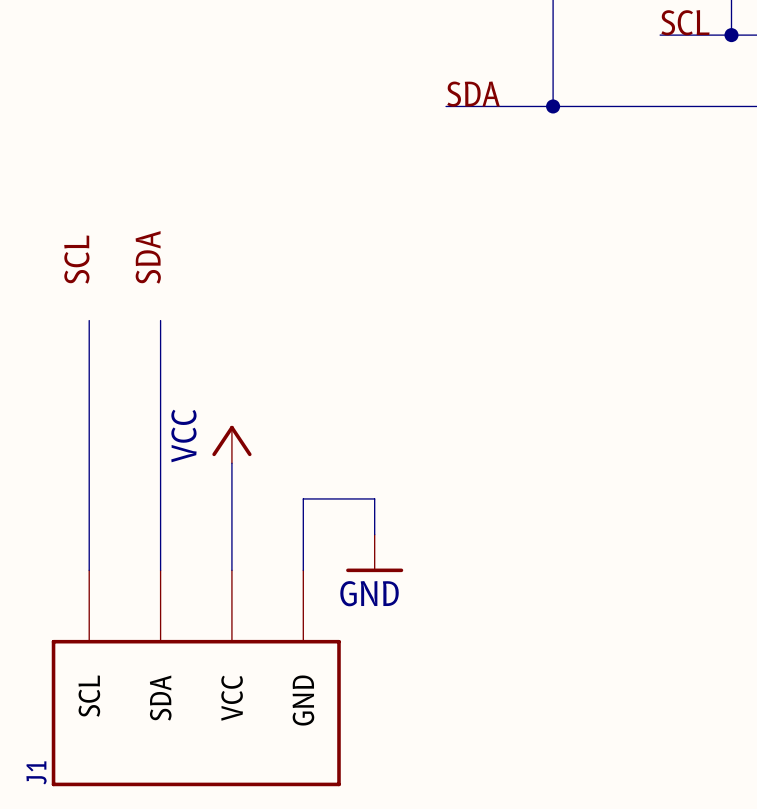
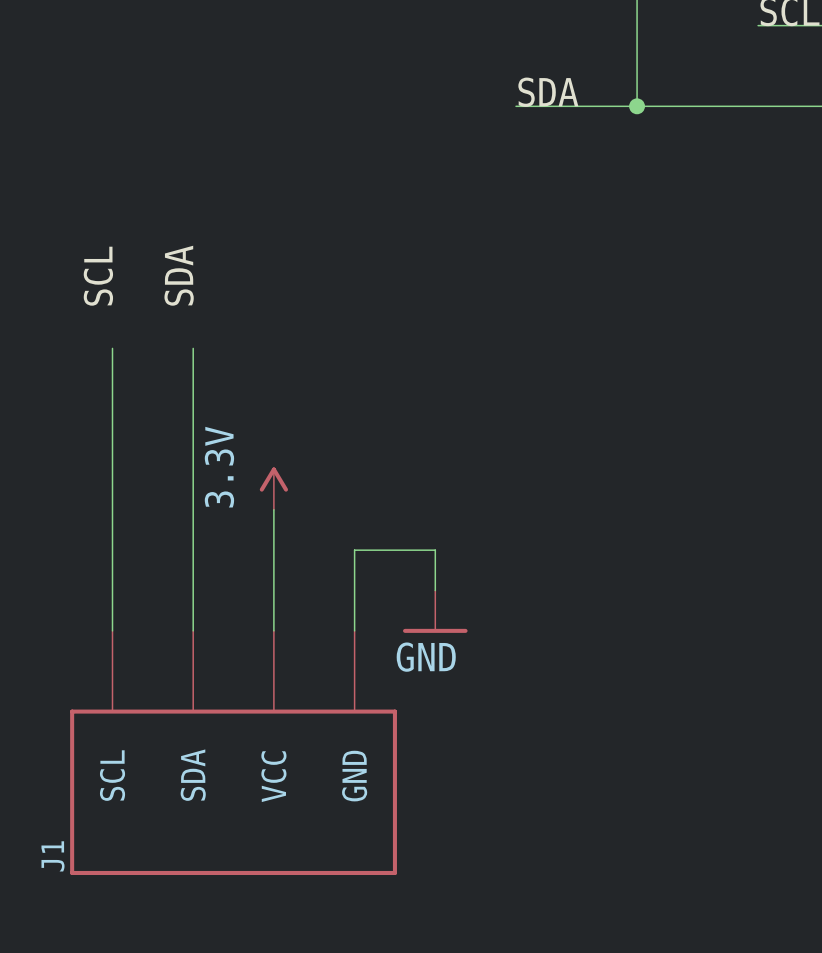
power symbol: VCC (231, 444) -> 3.3V (273, 488)

